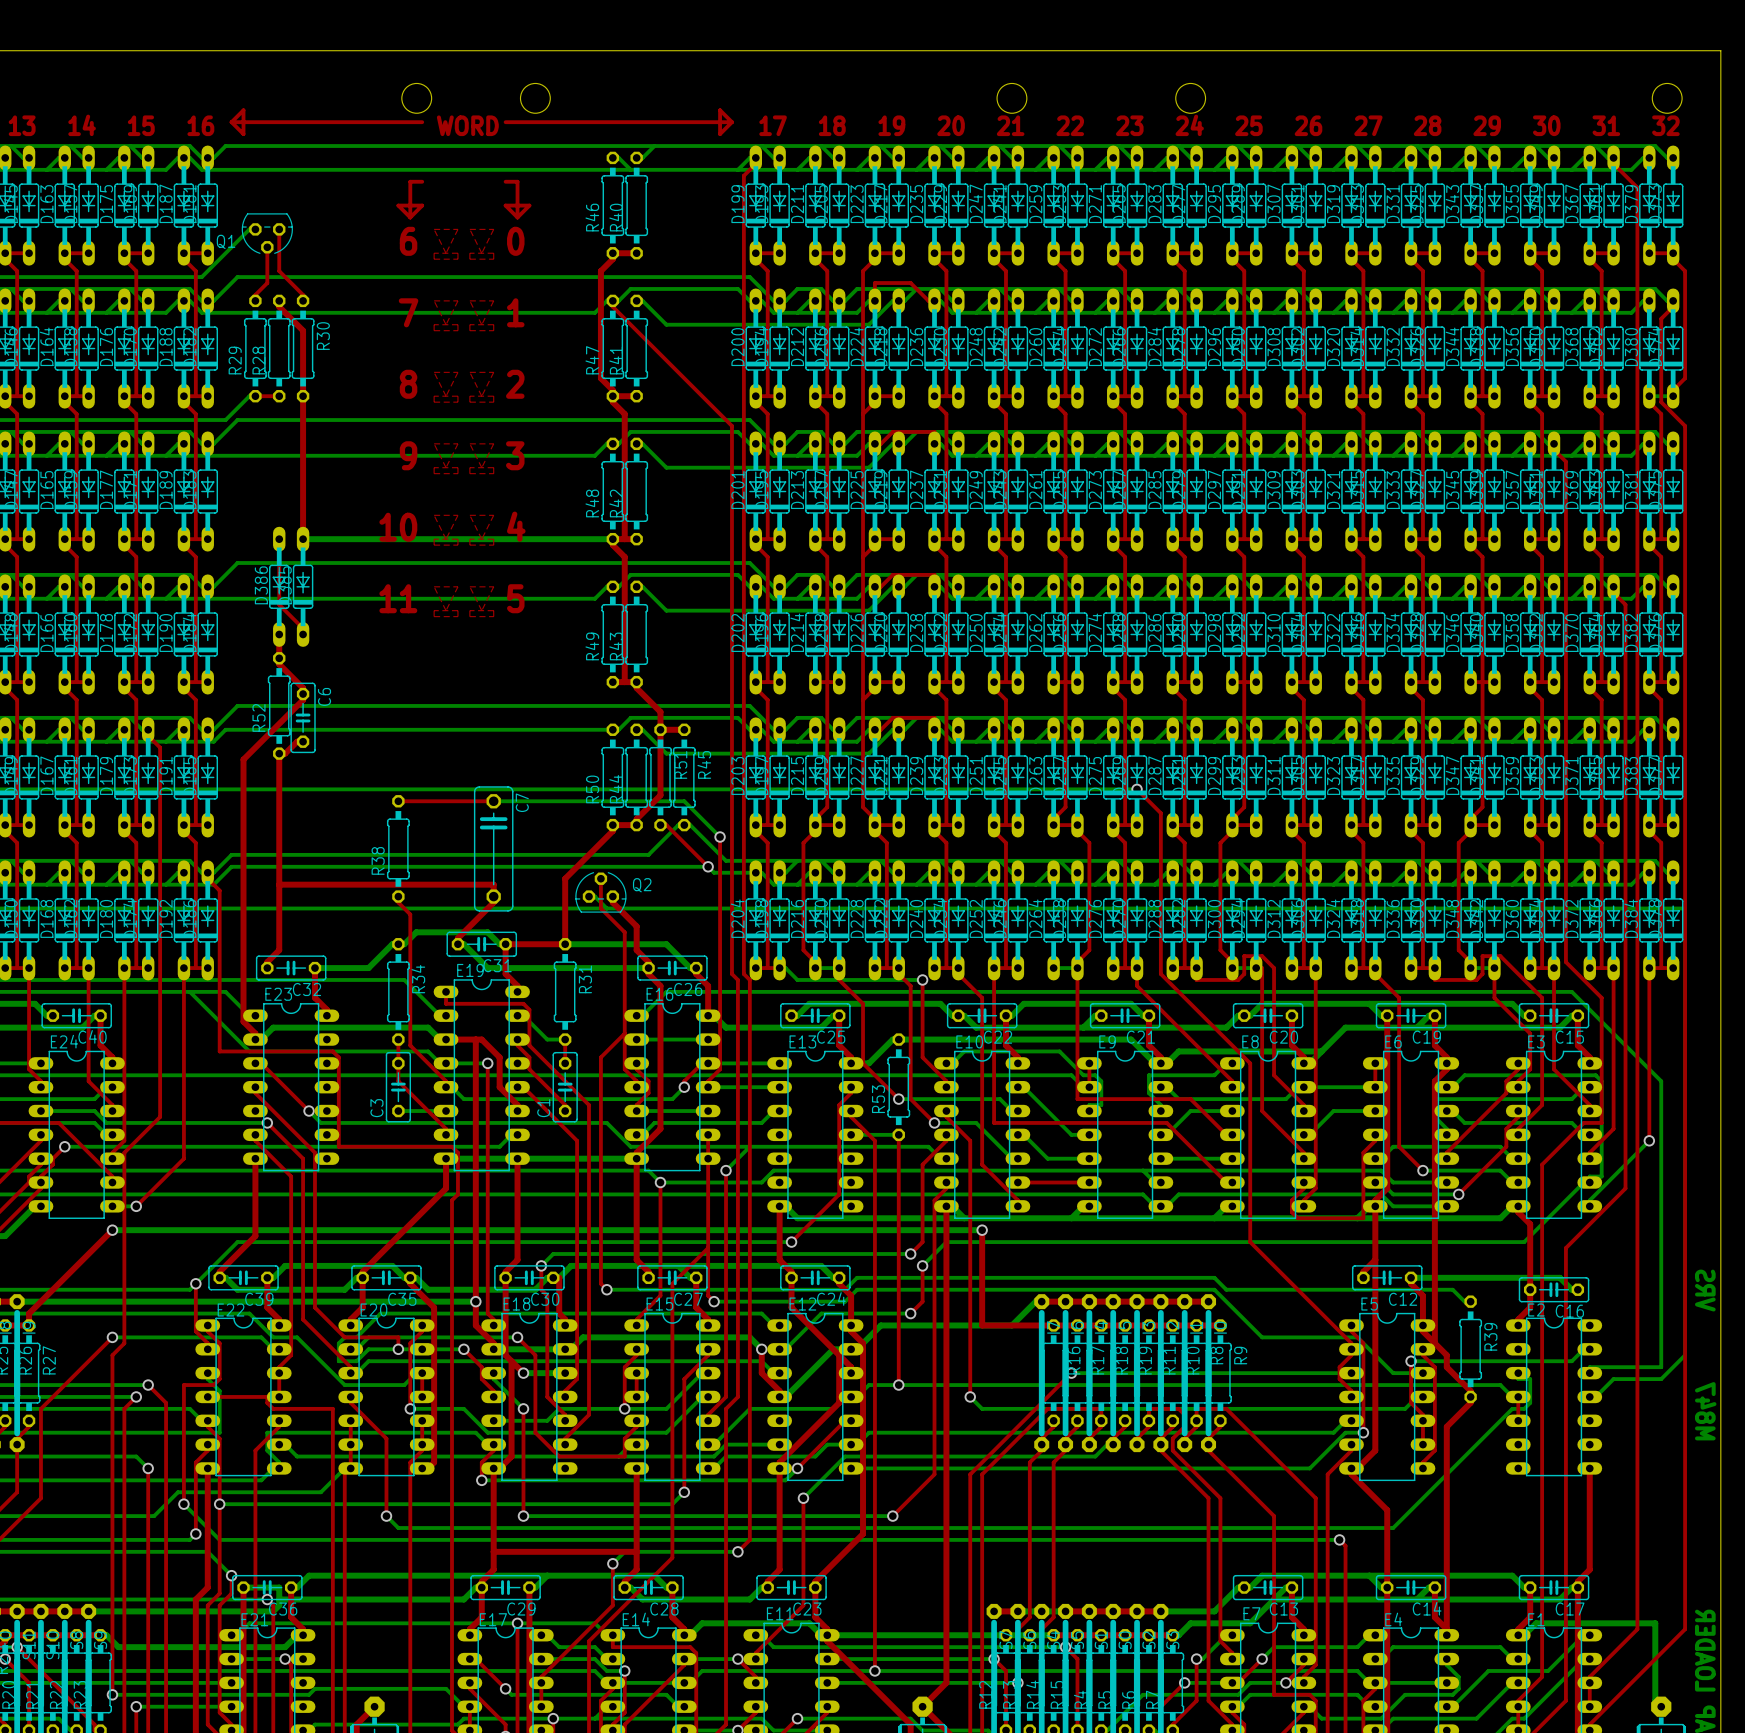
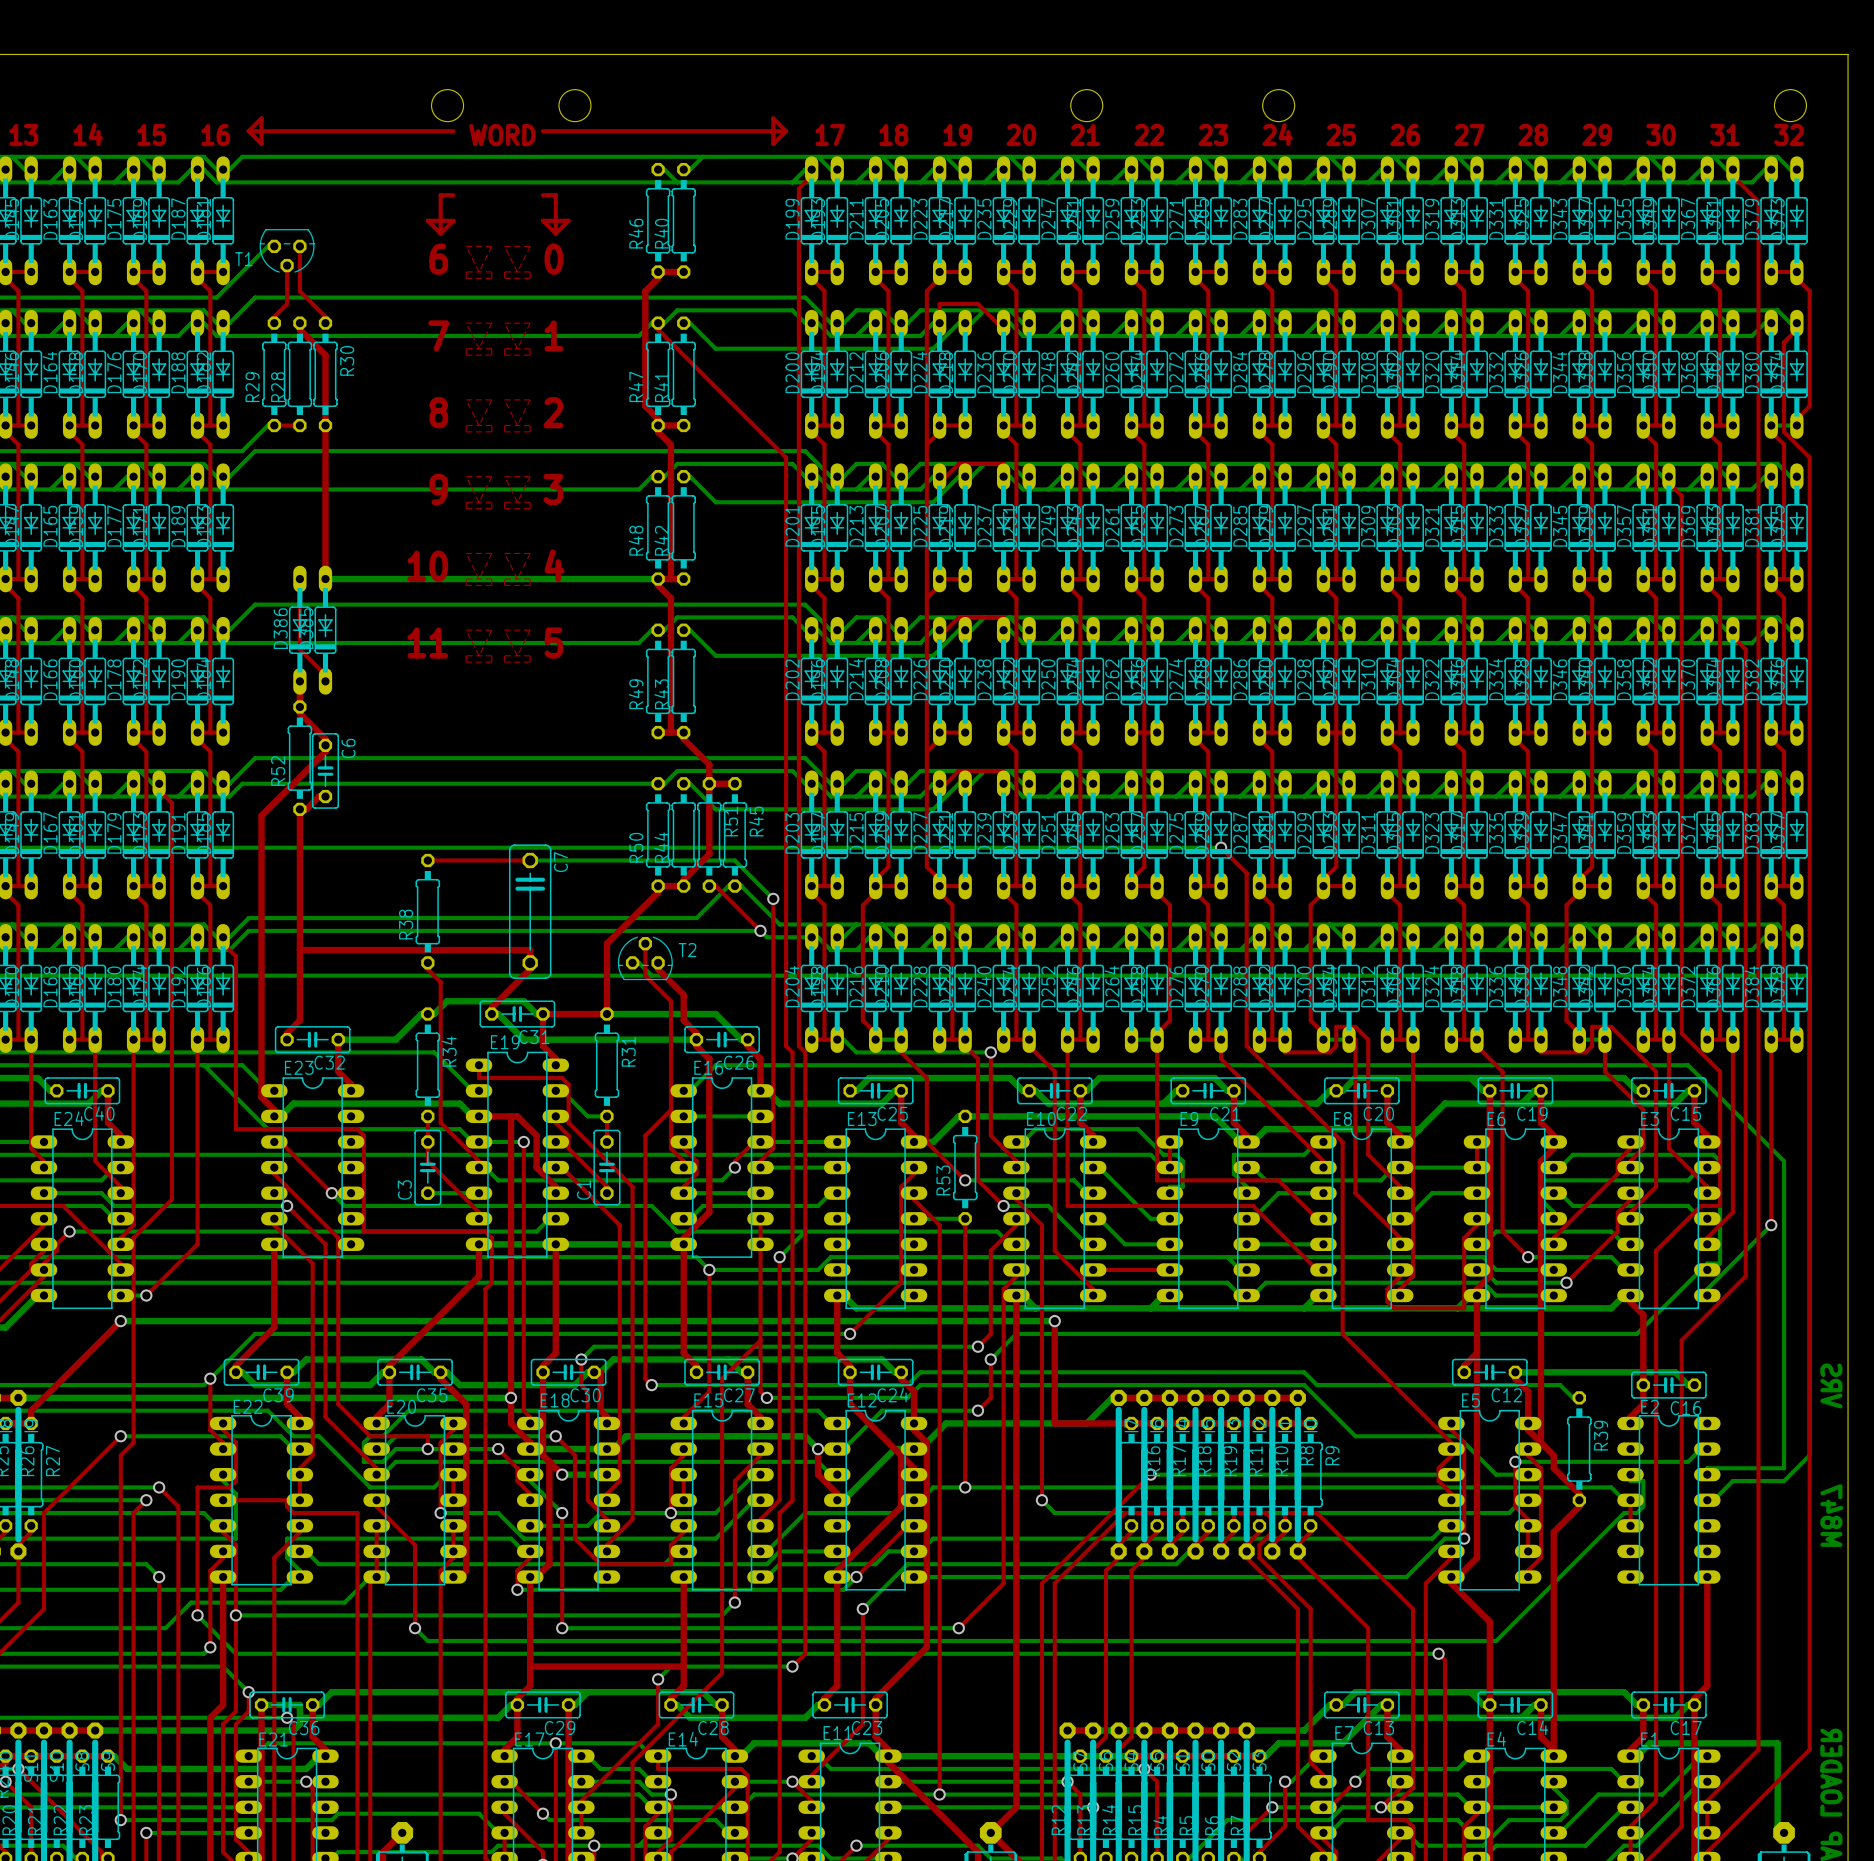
Q1 name: Q1 (226, 241) -> T1 (243, 259)
Q2 name: Q2 (642, 885) -> T2 (687, 950)

